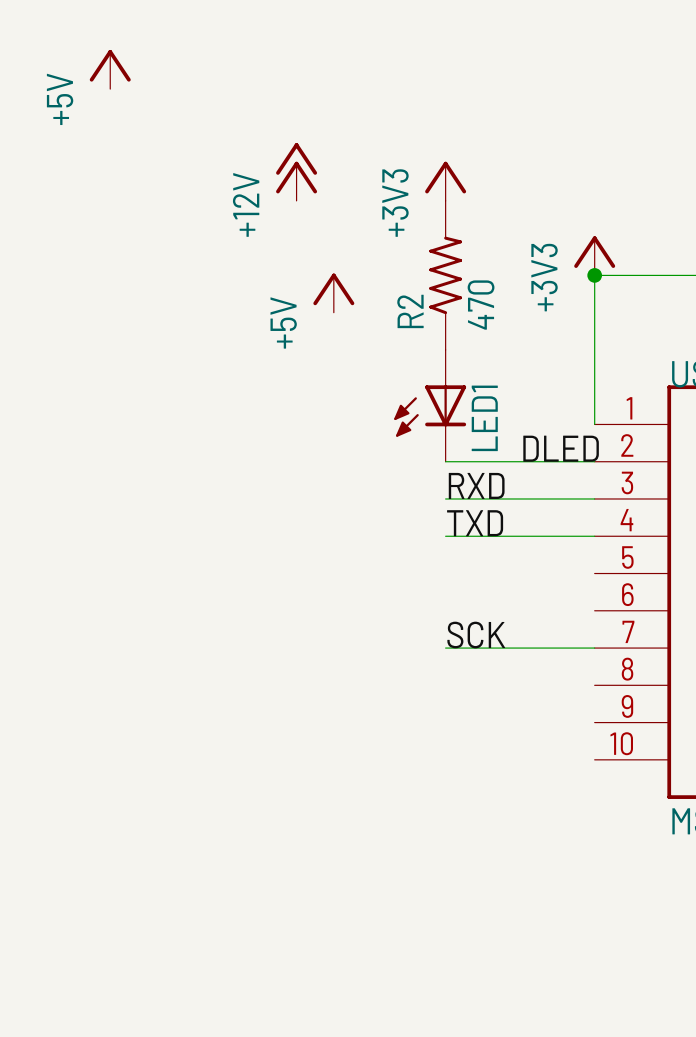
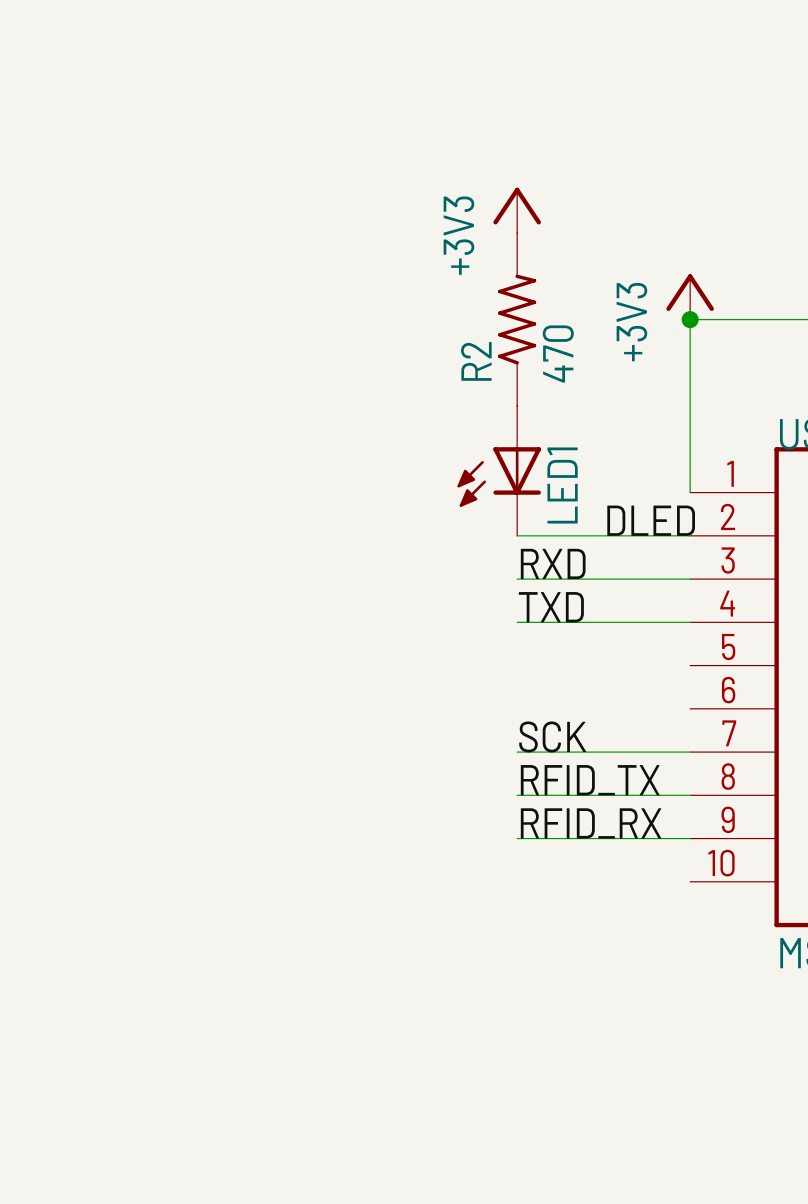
power symbol: +5V (110, 69) -> none
power symbol: +12V (296, 171) -> none
power symbol: +5V (333, 293) -> none
label: none -> RFID_TX (590, 780)
wire: none -> (517, 795) (690, 795)
label: none -> RFID_RX (591, 823)
wire: none -> (517, 838) (690, 838)

